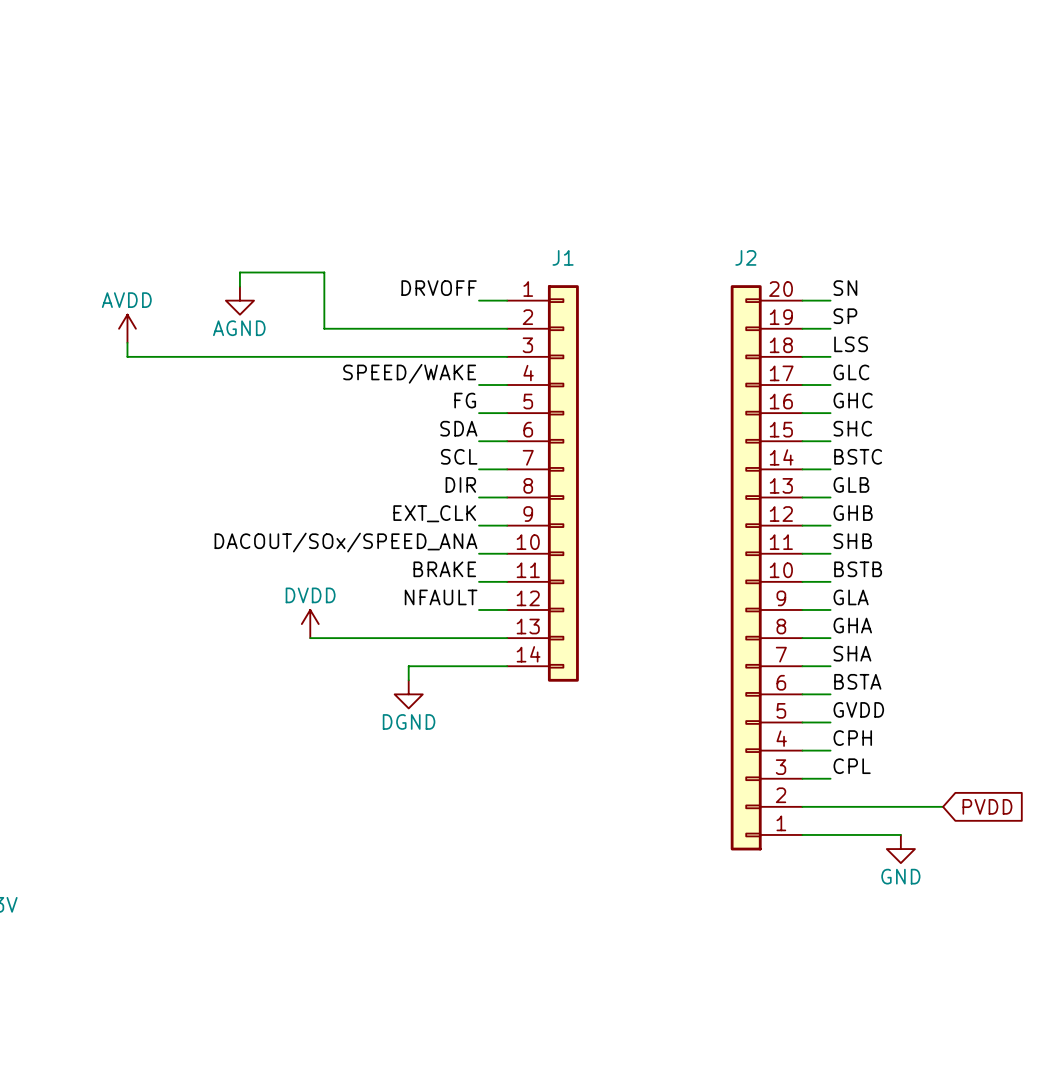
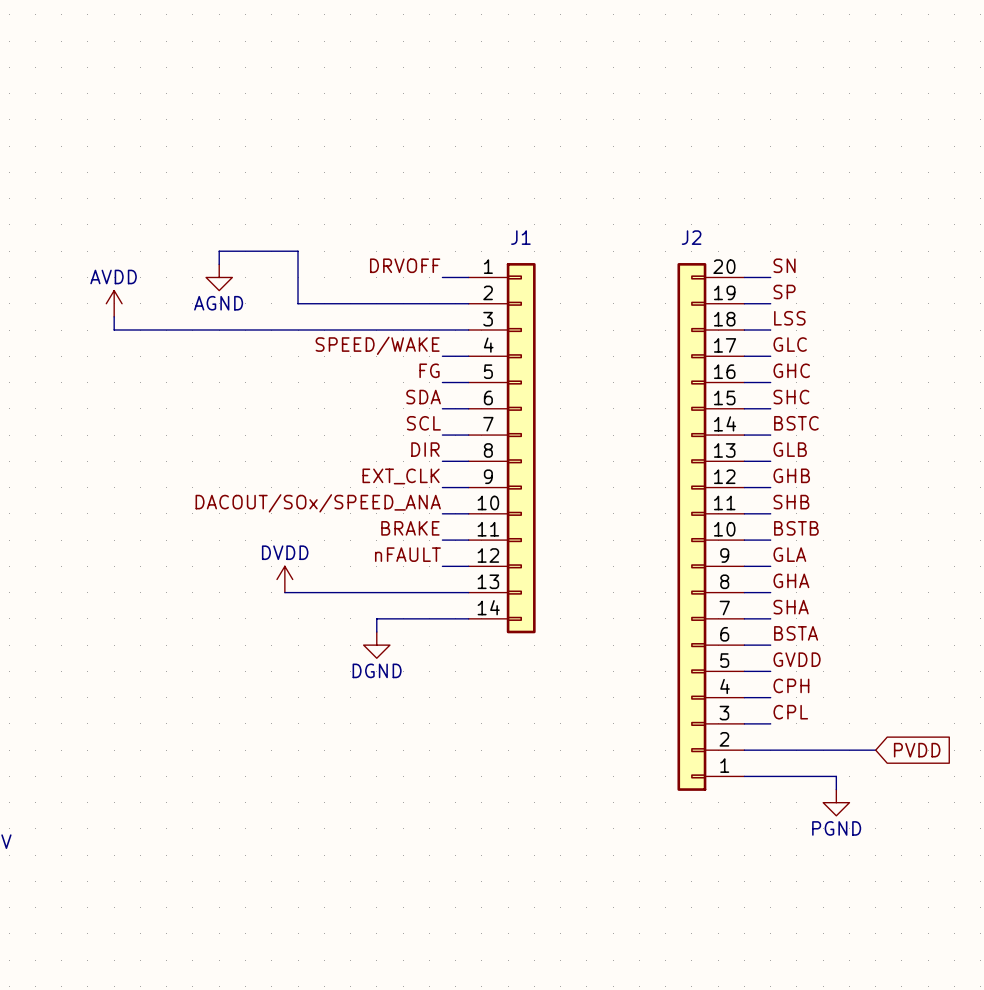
label: NFAULT (441, 597) -> nFAULT (407, 554)
power symbol: GND (900, 849) -> none
power symbol: none -> PGND (836, 802)

